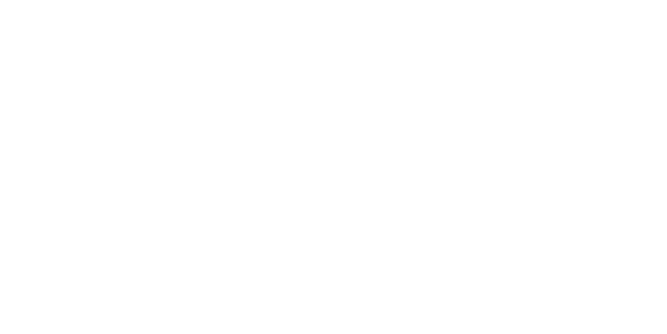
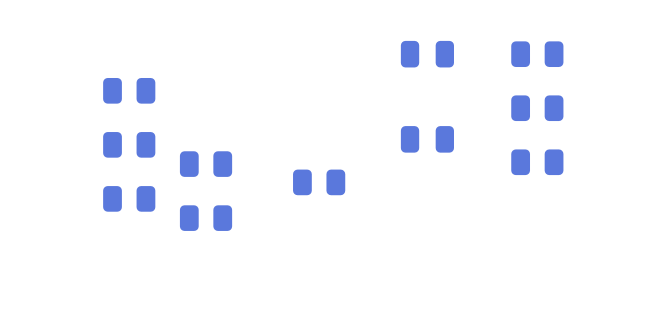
part: none -> (427, 54)
part: none -> (537, 54)
part: none -> (129, 90)
part: none -> (537, 108)
part: none -> (427, 139)
part: none -> (129, 144)
part: none -> (537, 162)
part: none -> (206, 164)
part: none -> (319, 182)
part: none -> (129, 198)
part: none -> (206, 218)

